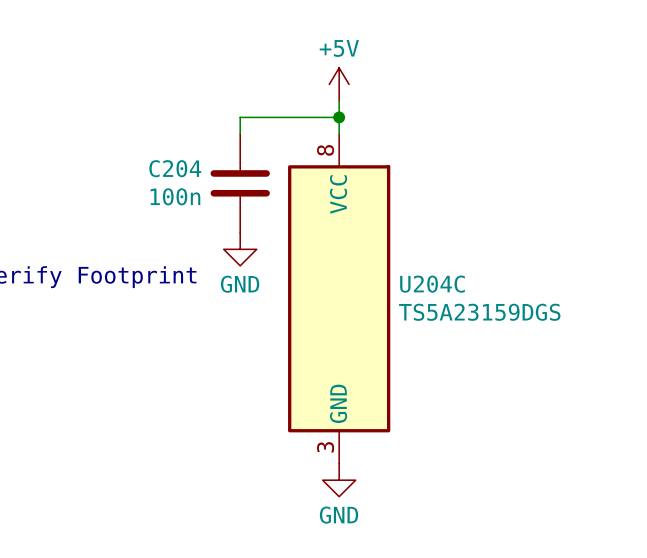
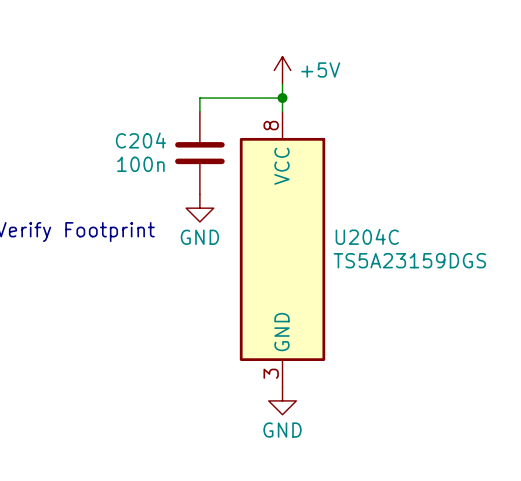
power symbol text position: +5V (339, 48) -> +5V (320, 69)

